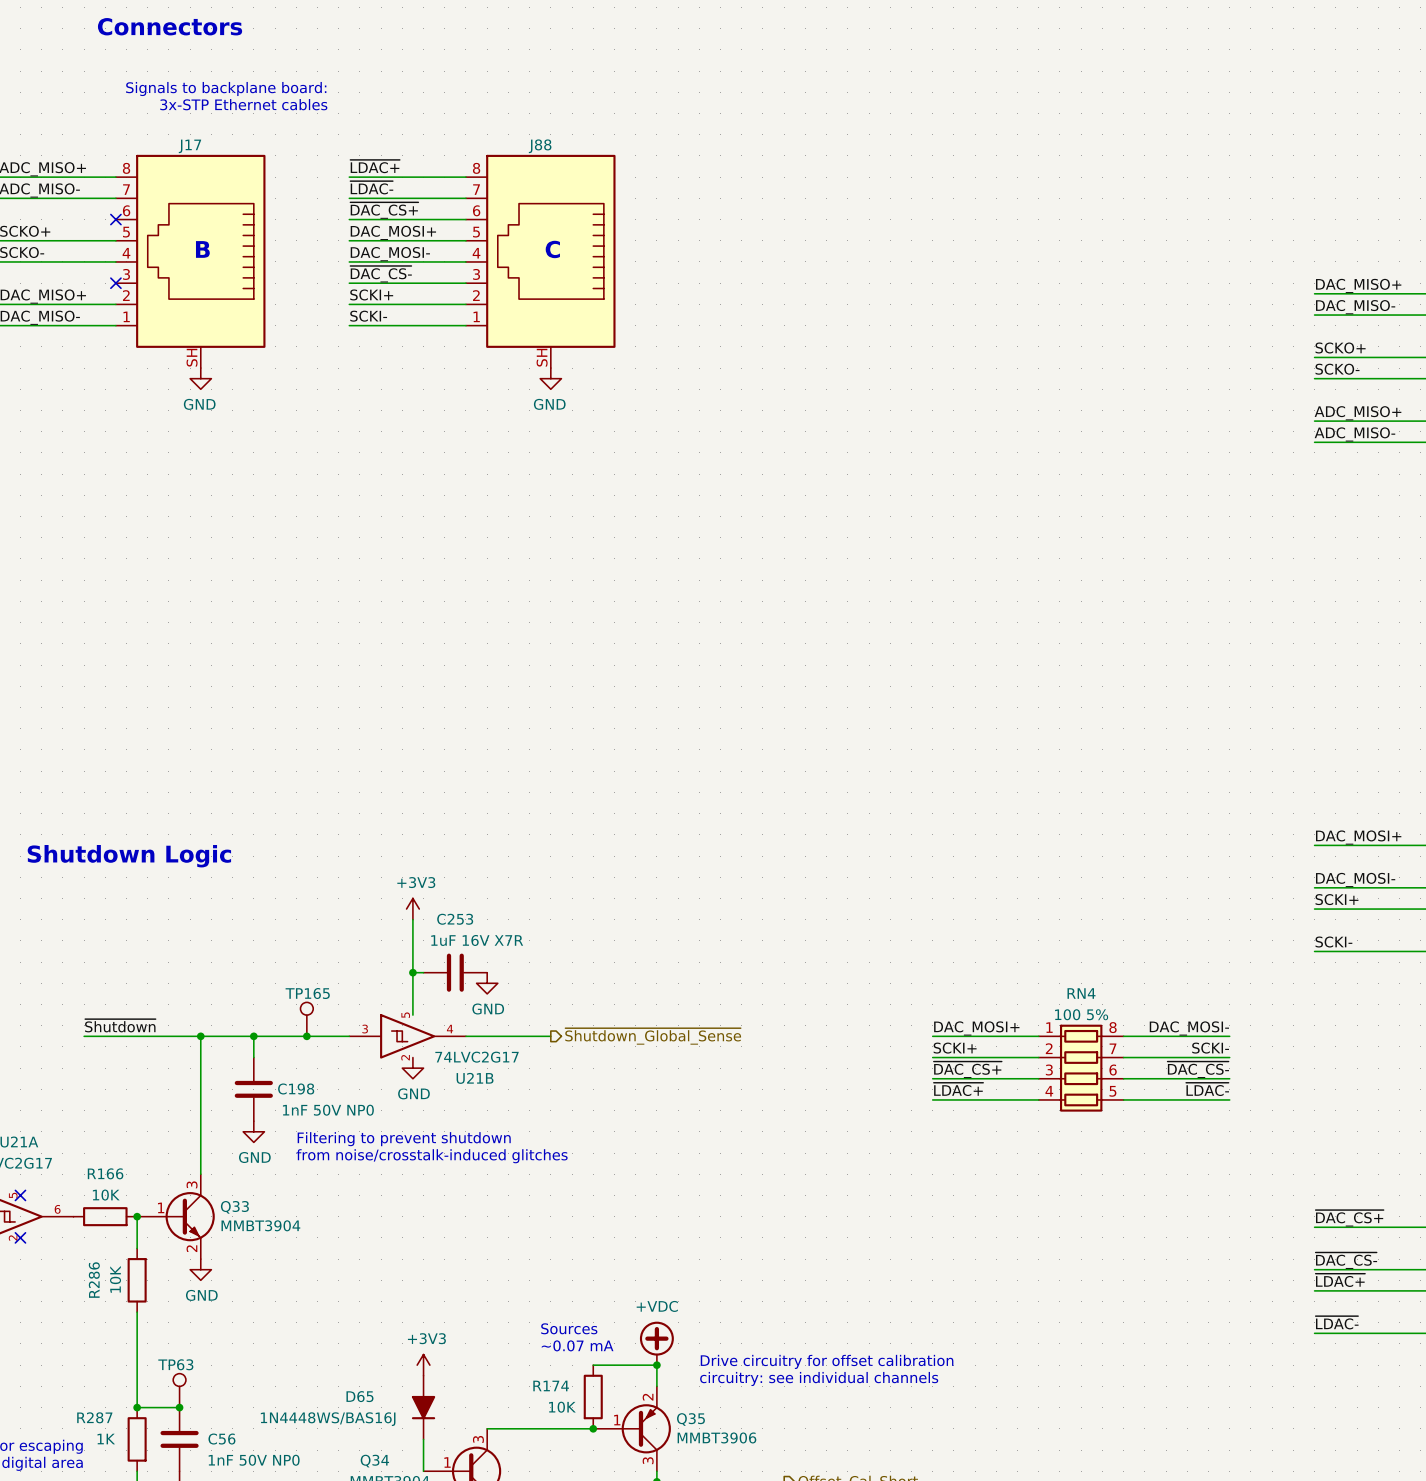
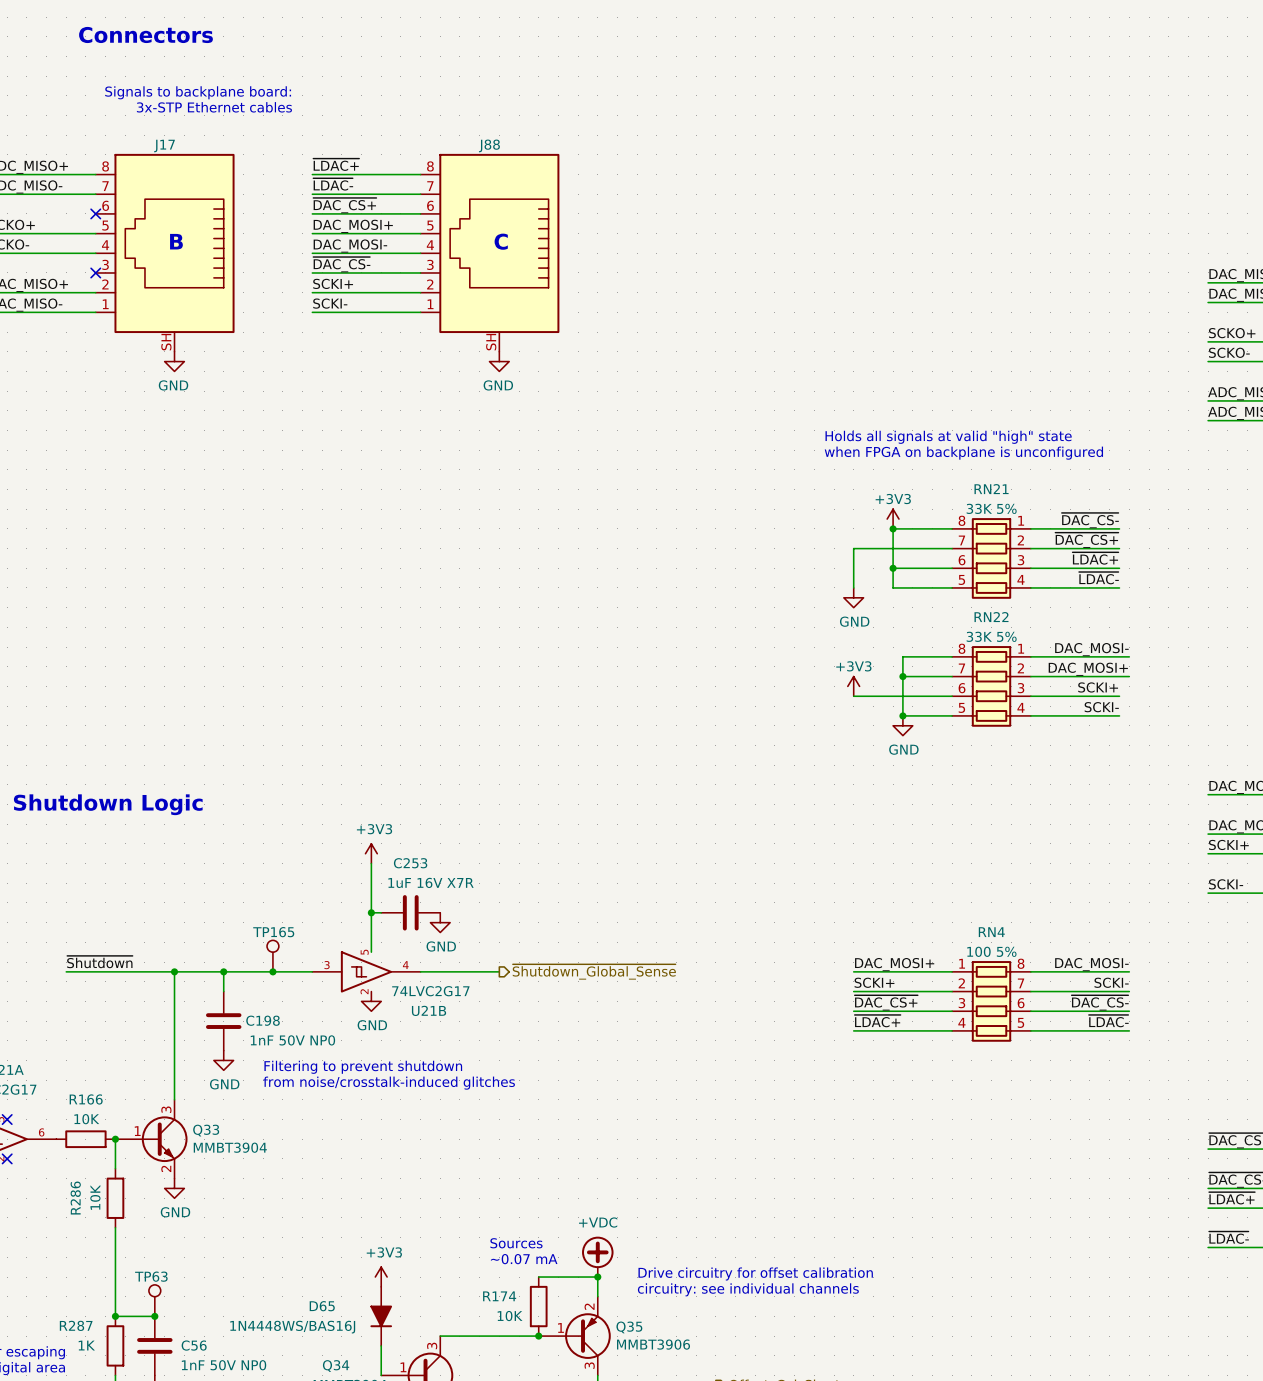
text: none -> Holds all signals at valid "high" state (948, 437)
text: none -> when FPGA on backplane is unconfigured (963, 453)
power symbol: none -> +3V3 (893, 519)
label: none -> ~{DAC_CS-} (1090, 520)
junction: none -> (893, 528)
wire: none -> (952, 528) (893, 528) (893, 587) (952, 587)
wire: none -> (1030, 528) (1119, 528)
label: none -> ~{DAC_CS+} (1086, 540)
wire: none -> (952, 548) (853, 548) (853, 587)
wire: none -> (1030, 548) (1119, 548)
RN21: none -> 33K 5% (991, 558)
label: none -> ~{LDAC+} (1095, 558)
wire: none -> (893, 568) (952, 568)
junction: none -> (893, 568)
wire: none -> (1030, 568) (1119, 568)
label: none -> ~{LDAC-} (1098, 578)
wire: none -> (1030, 587) (1119, 587)
power symbol: none -> GND (853, 597)
label: none -> DAC_MOSI- (1091, 649)
wire: none -> (952, 656) (902, 656) (902, 715) (952, 715)
wire: none -> (1030, 656) (1129, 656)
label: none -> DAC_MOSI+ (1088, 669)
wire: none -> (902, 676) (952, 676)
junction: none -> (902, 676)
wire: none -> (1030, 676) (1129, 676)
power symbol: none -> +3V3 (853, 686)
RN22: none -> 33K 5% (991, 686)
label: none -> SCKI+ (1098, 687)
wire: none -> (853, 696) (952, 696)
wire: none -> (1030, 696) (1119, 696)
label: none -> SCKI- (1101, 707)
junction: none -> (902, 715)
wire: none -> (1030, 715) (1119, 715)
power symbol: none -> GND (902, 725)

